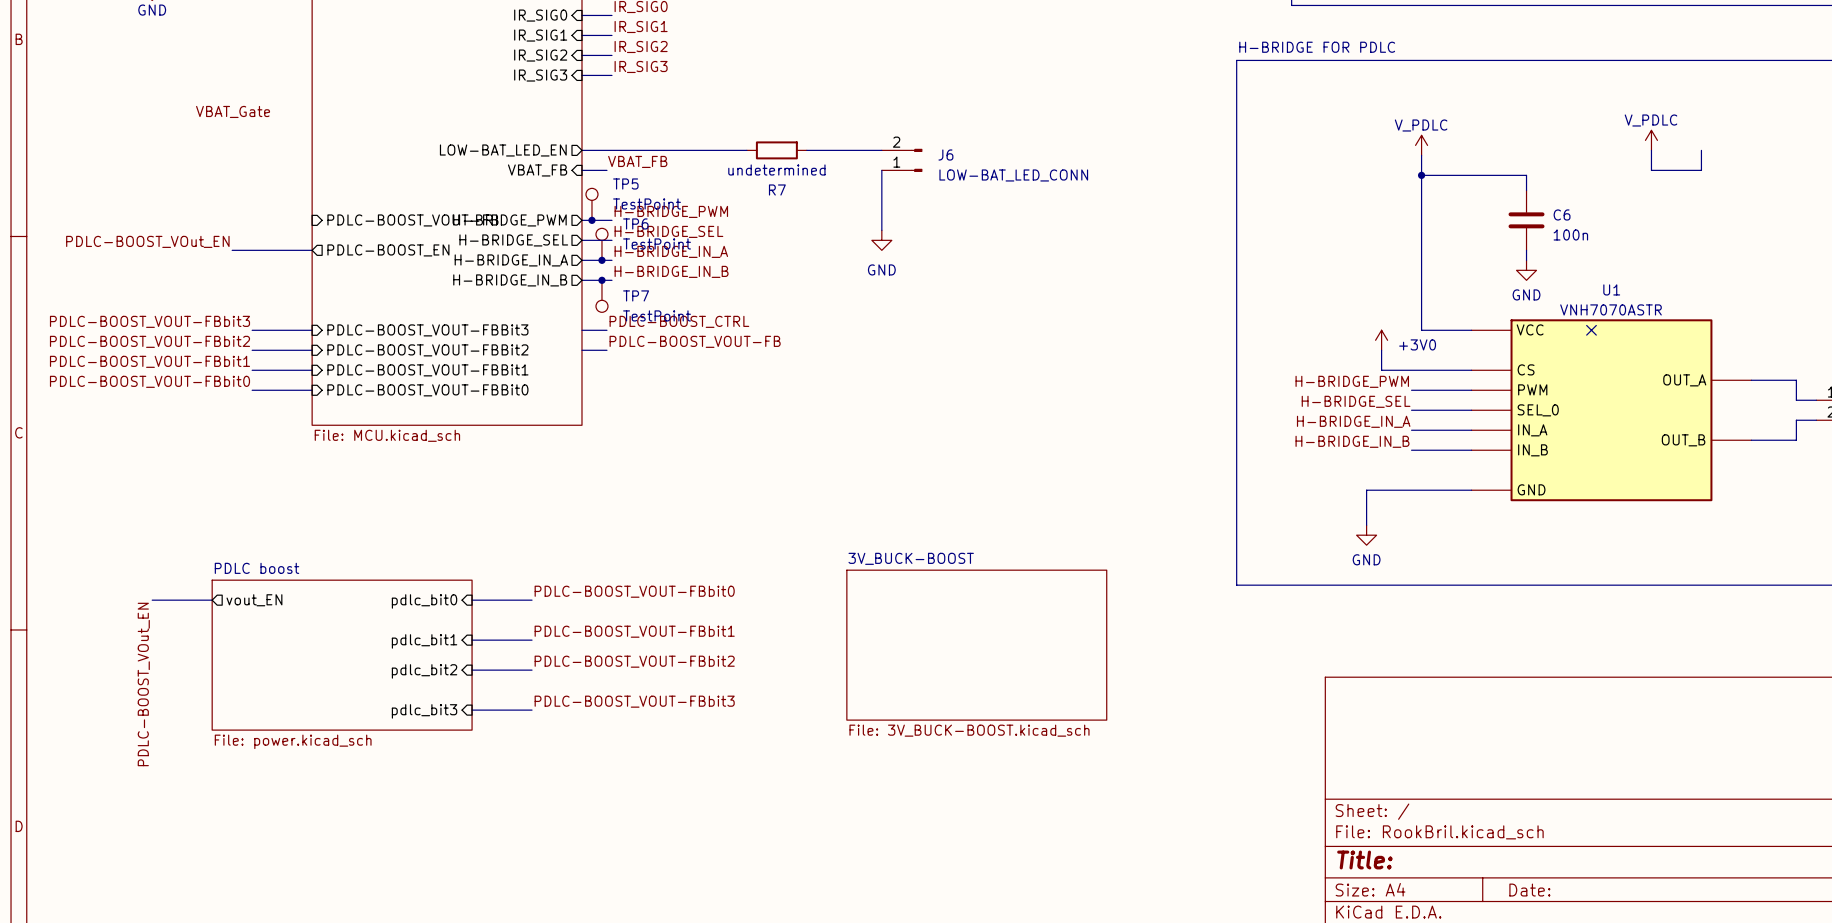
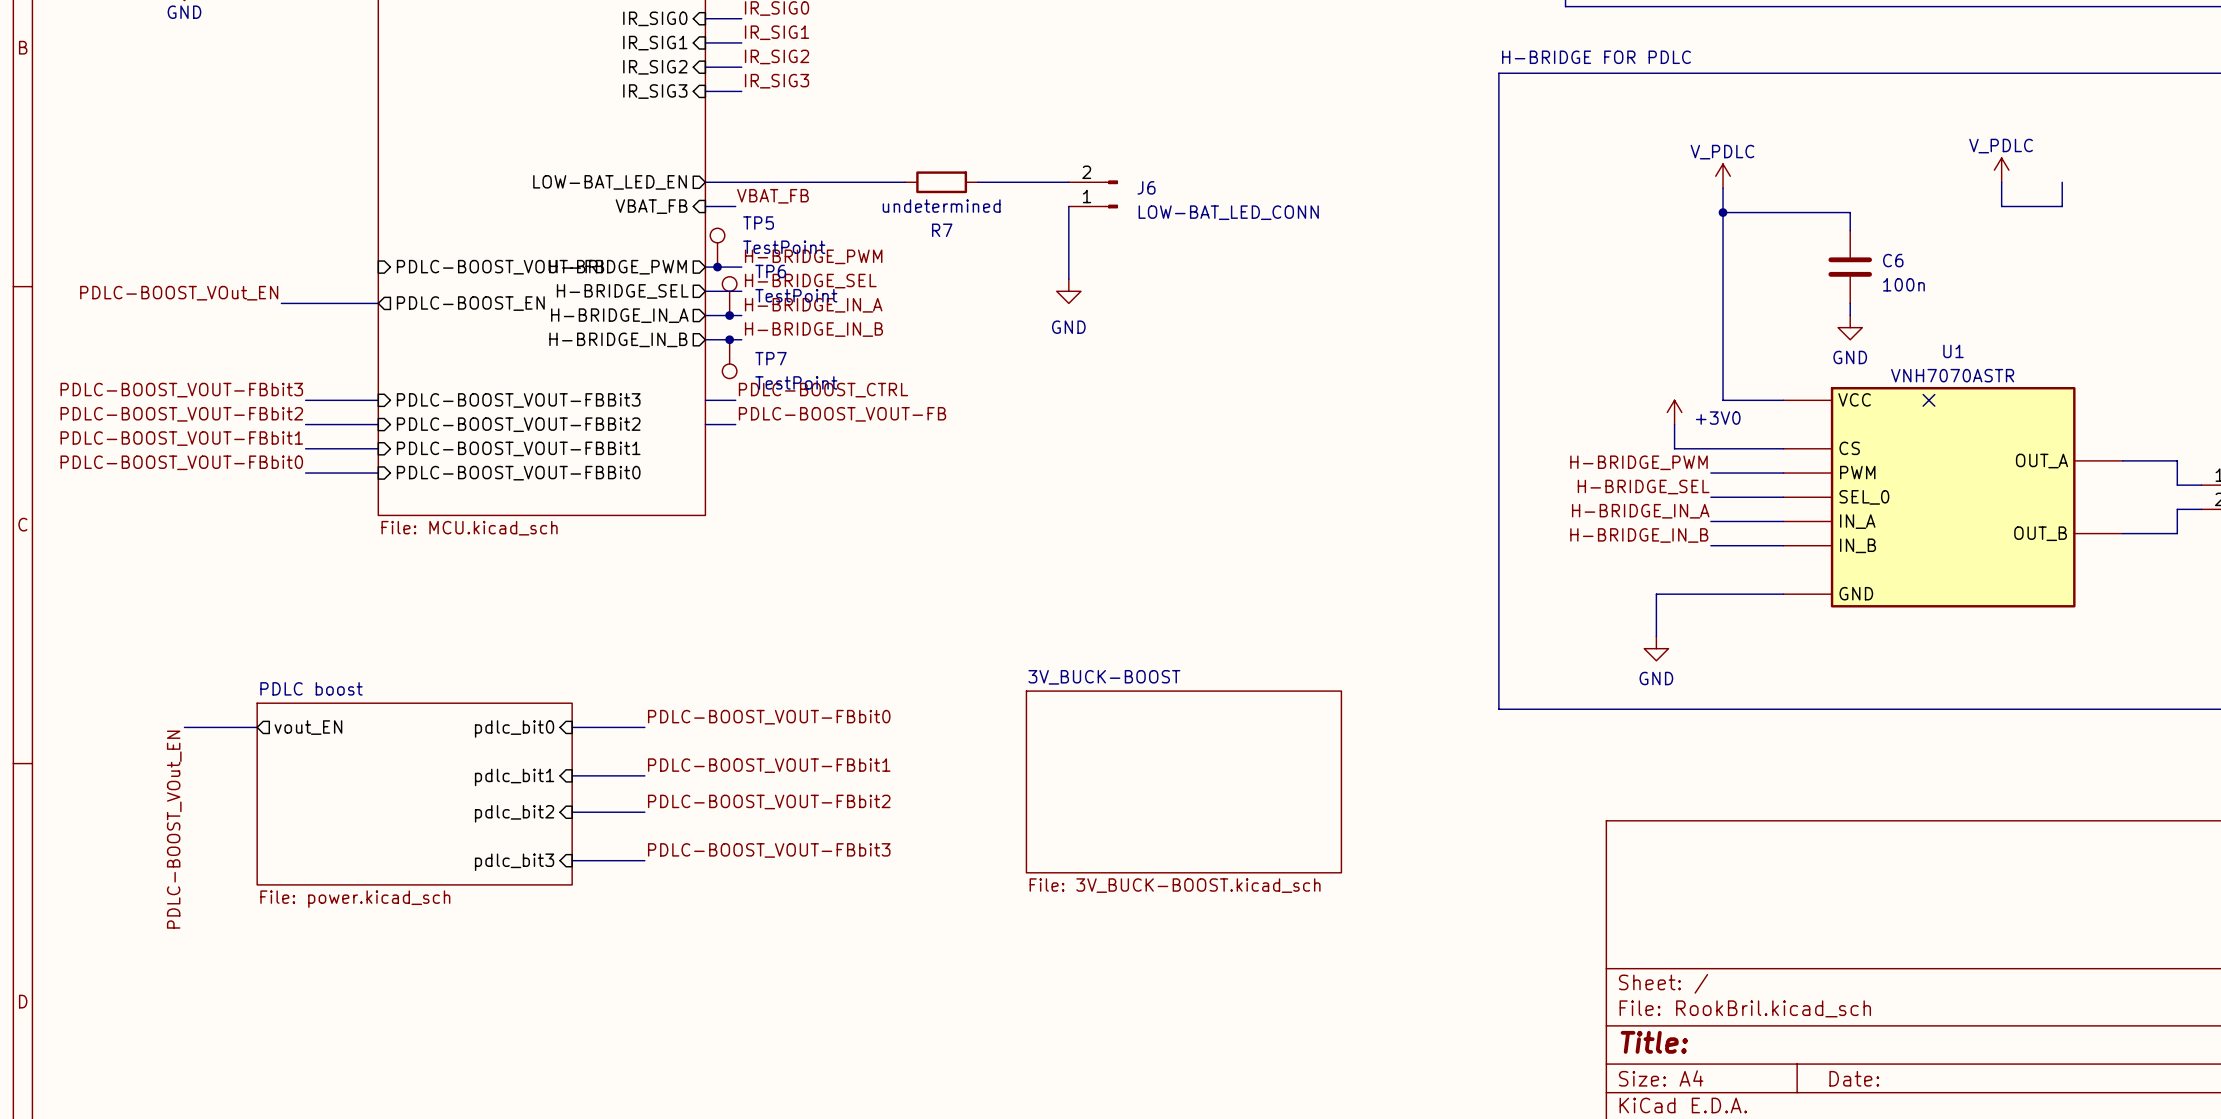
label: VBAT_Gate (233, 111) -> none

